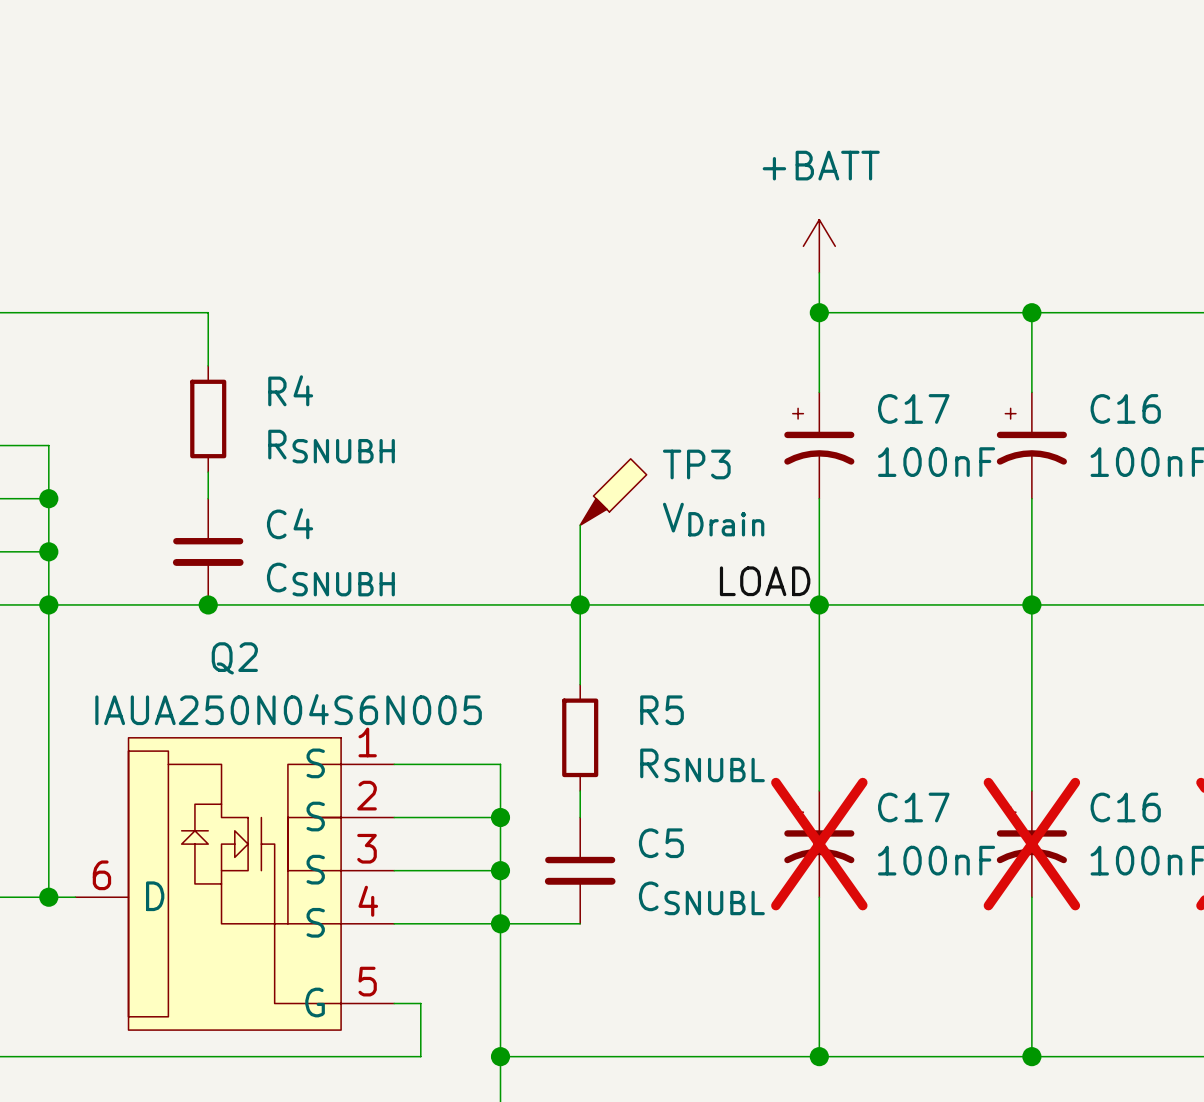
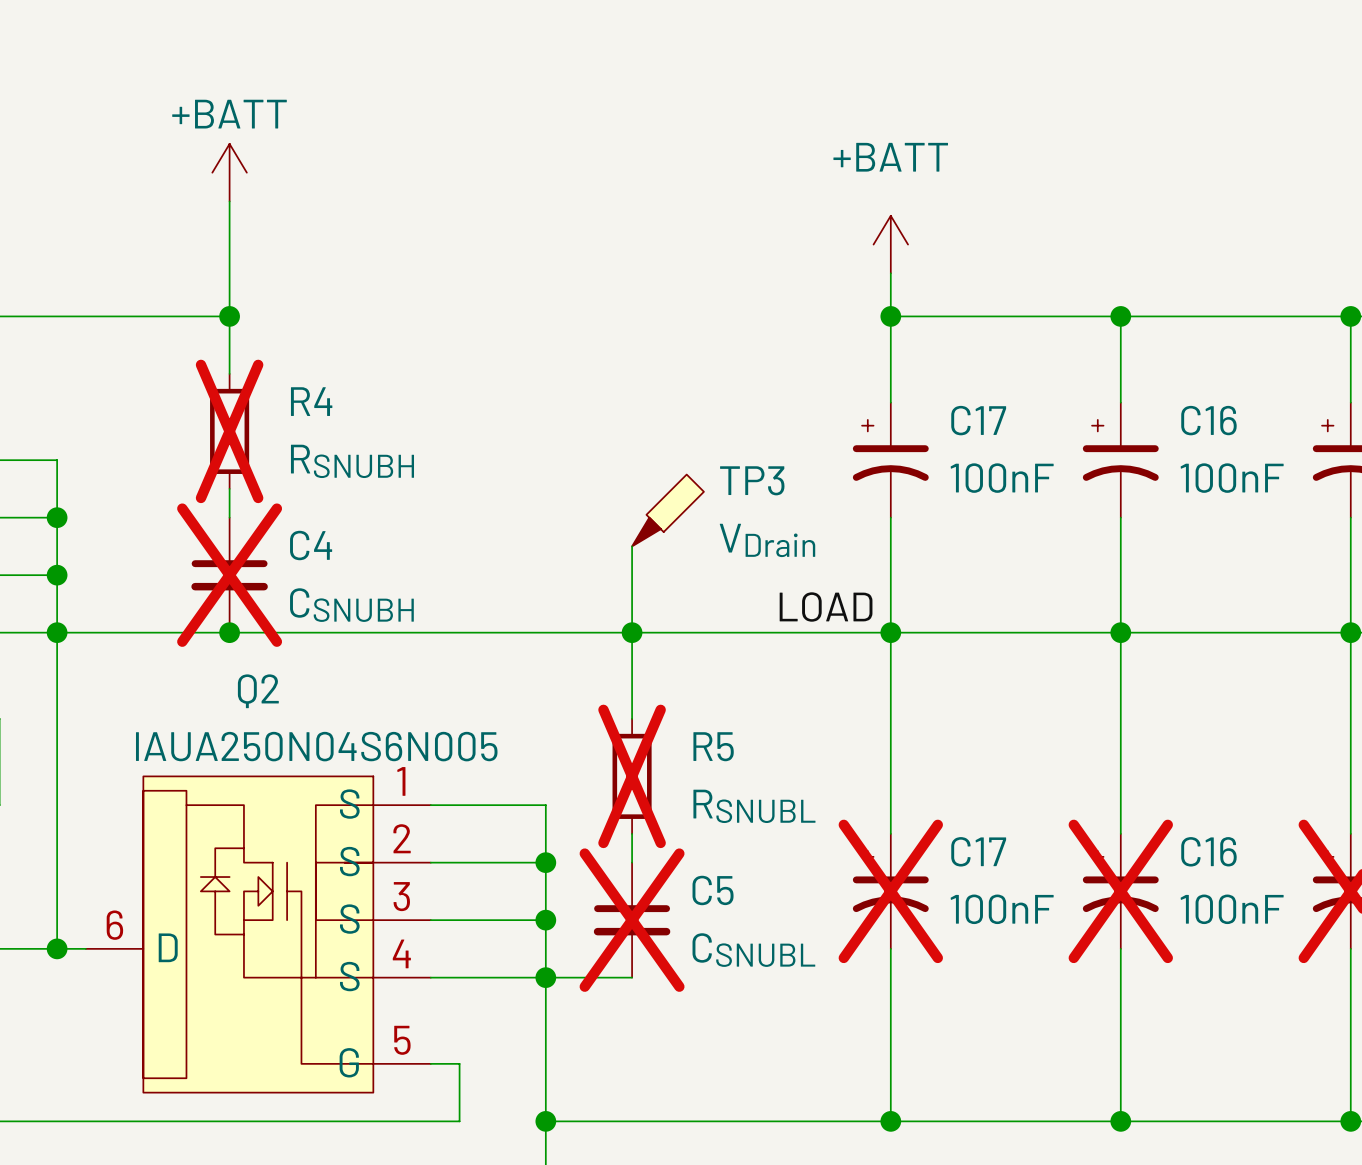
power symbol: none -> +BATT (229, 172)
wire: none -> (229, 201) (229, 316)
junction: none -> (229, 316)
R4 do-not-place cross: none -> (229, 431)
C4 do-not-place cross: none -> (229, 575)
R5 do-not-place cross: none -> (632, 776)
C5 do-not-place cross: none -> (632, 920)

